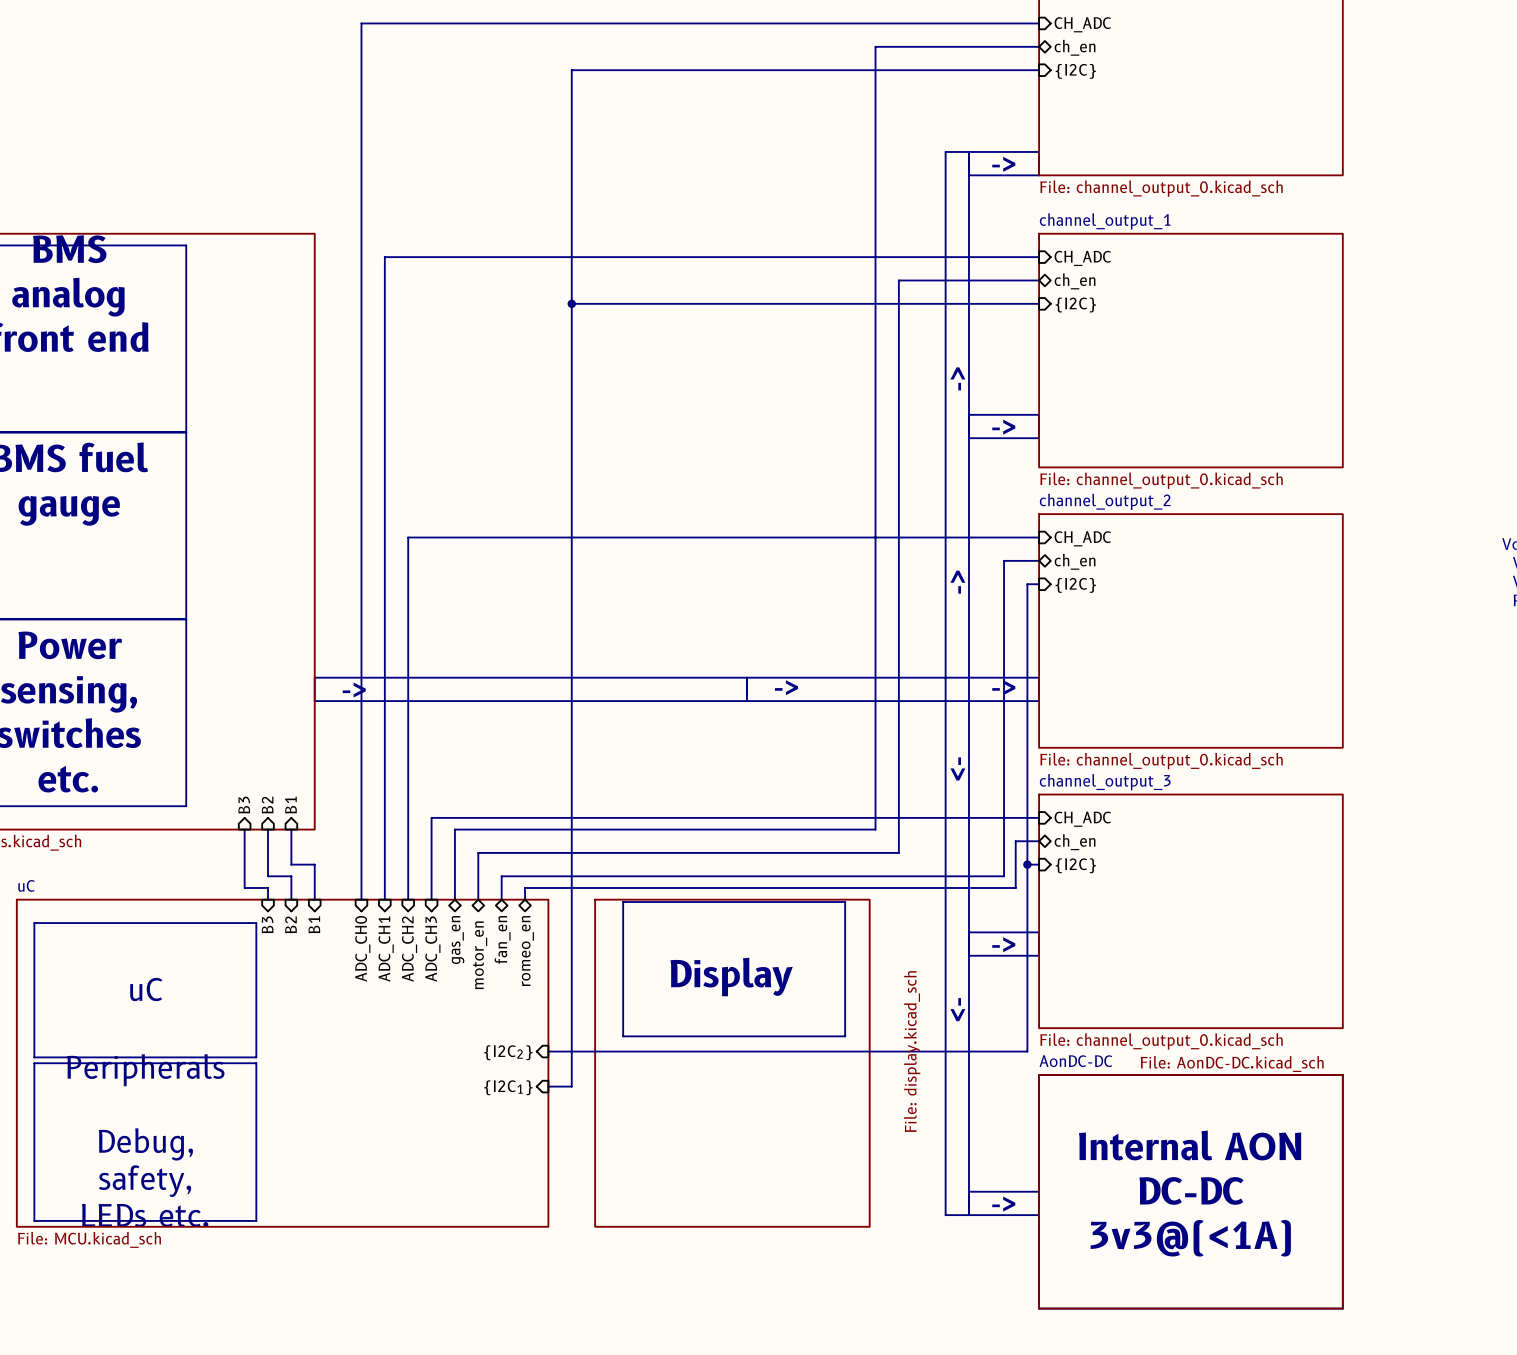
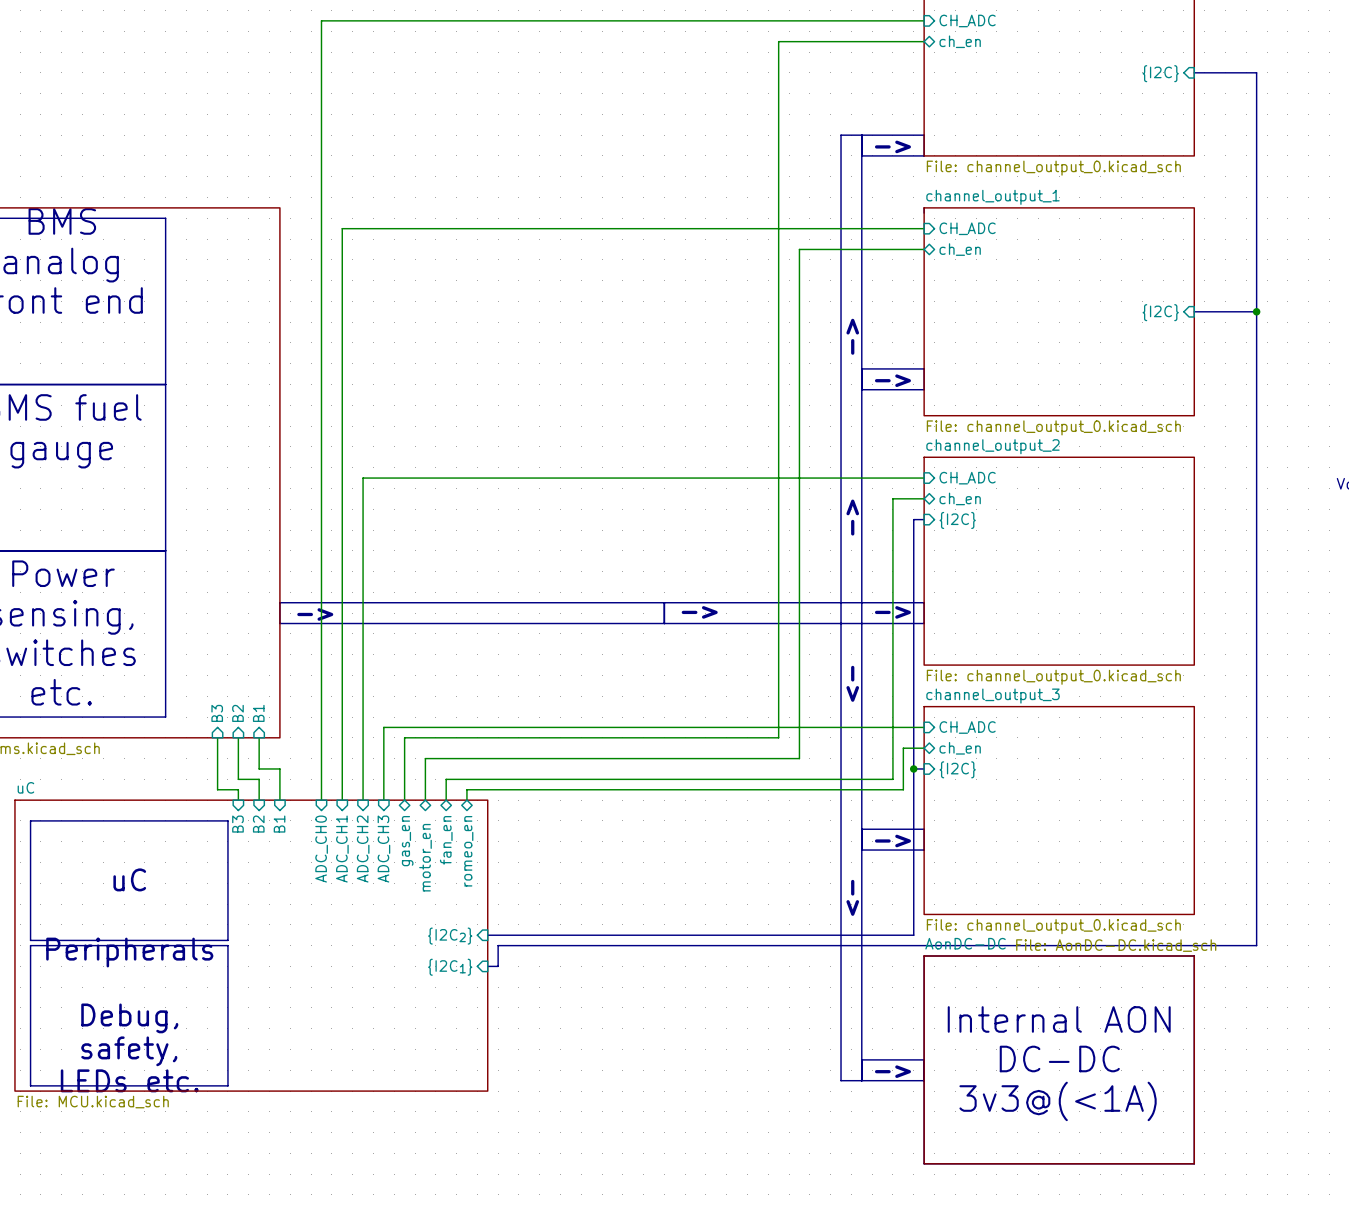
bus: (1039, 70) (571, 70) (571, 1086) (560, 1086) -> (1194, 72) (1256, 72) (1256, 945) (498, 945) (498, 966)
sheet pin: {I2C} (1075, 71) -> none
sheet pin: none -> {I2C} (1160, 73)
bus: (571, 303) (1039, 303) -> none
junction: (571, 303) -> none
sheet pin: {I2C} (1075, 305) -> none
bus: none -> (1194, 311) (1256, 311)
junction: none -> (1256, 311)
sheet pin: none -> {I2C} (1160, 312)
line: (623, 902) (845, 902) (845, 1036) (623, 1036) (623, 902) -> none
sheet Display: File: display.kicad_sch (732, 1063) -> none

